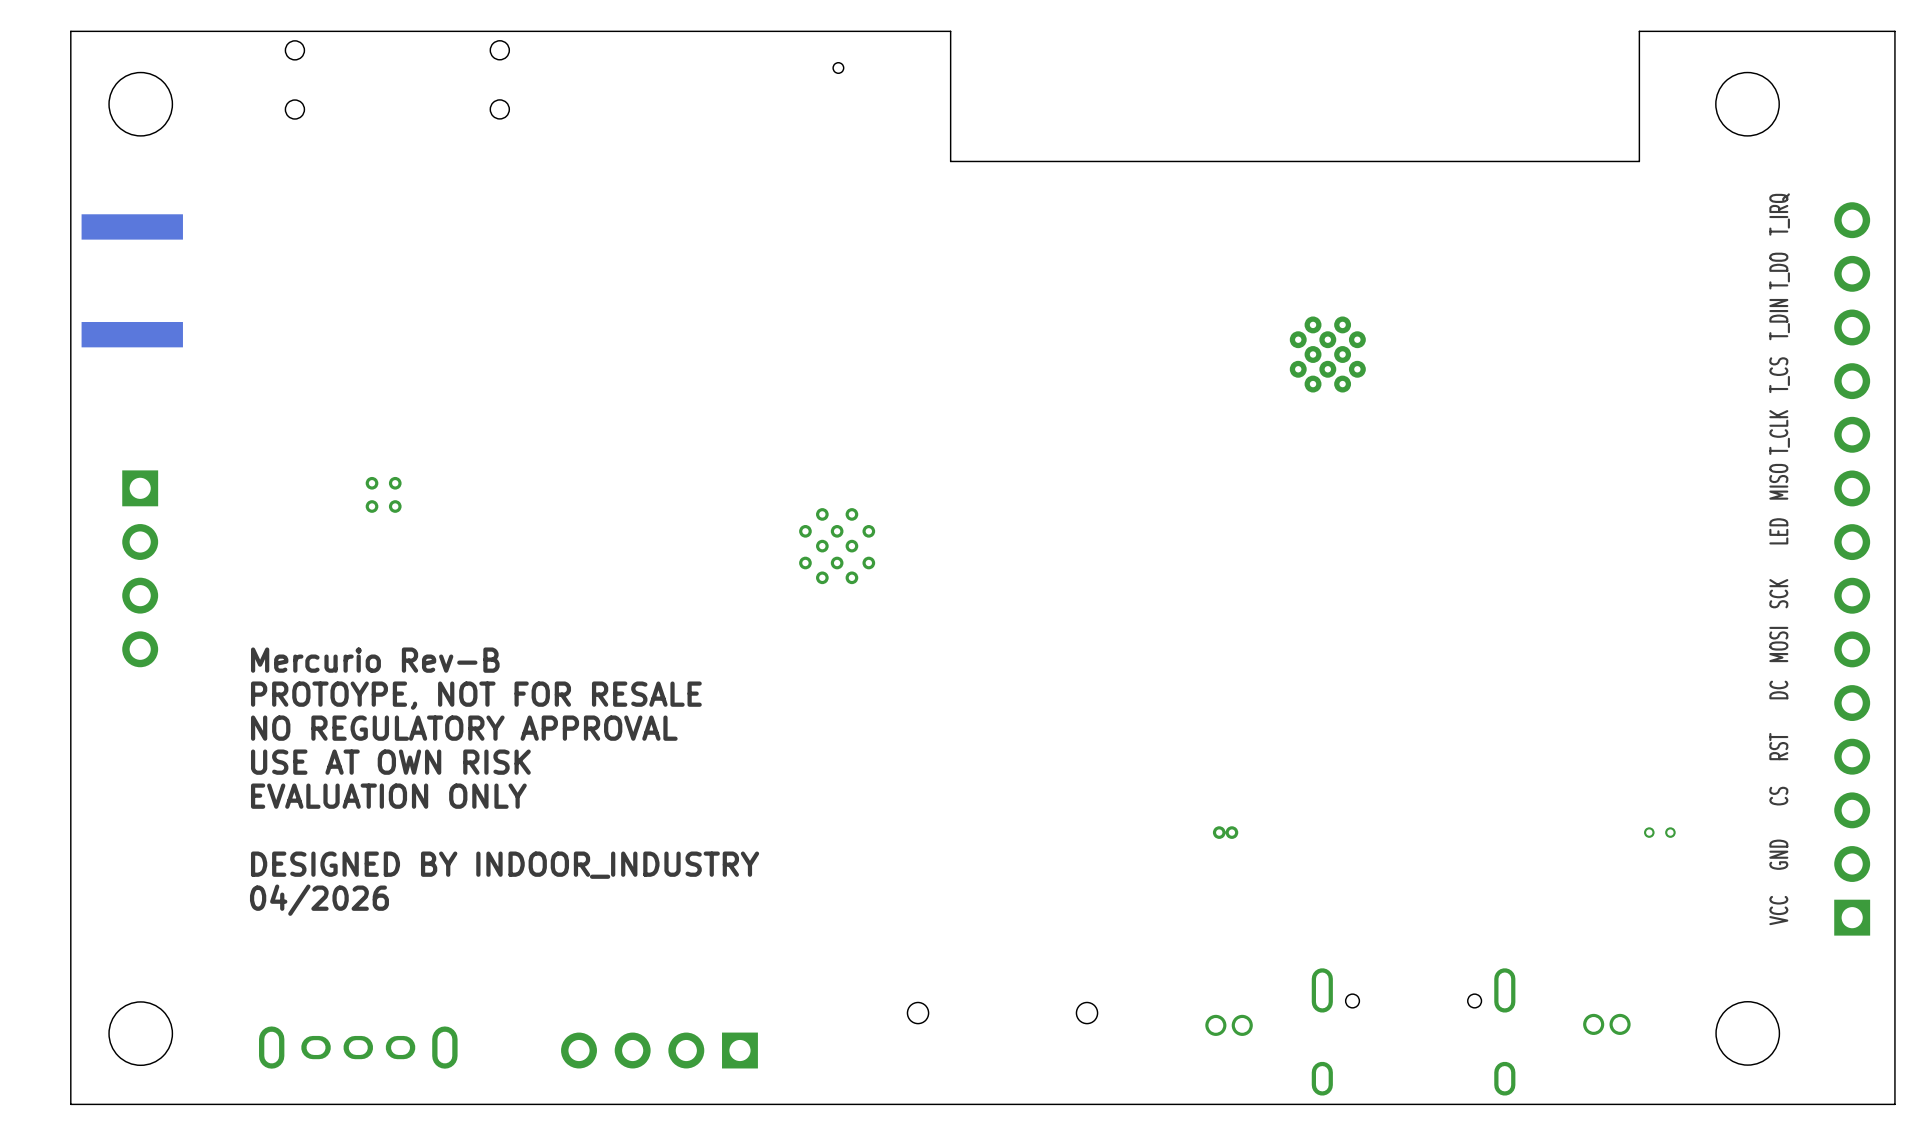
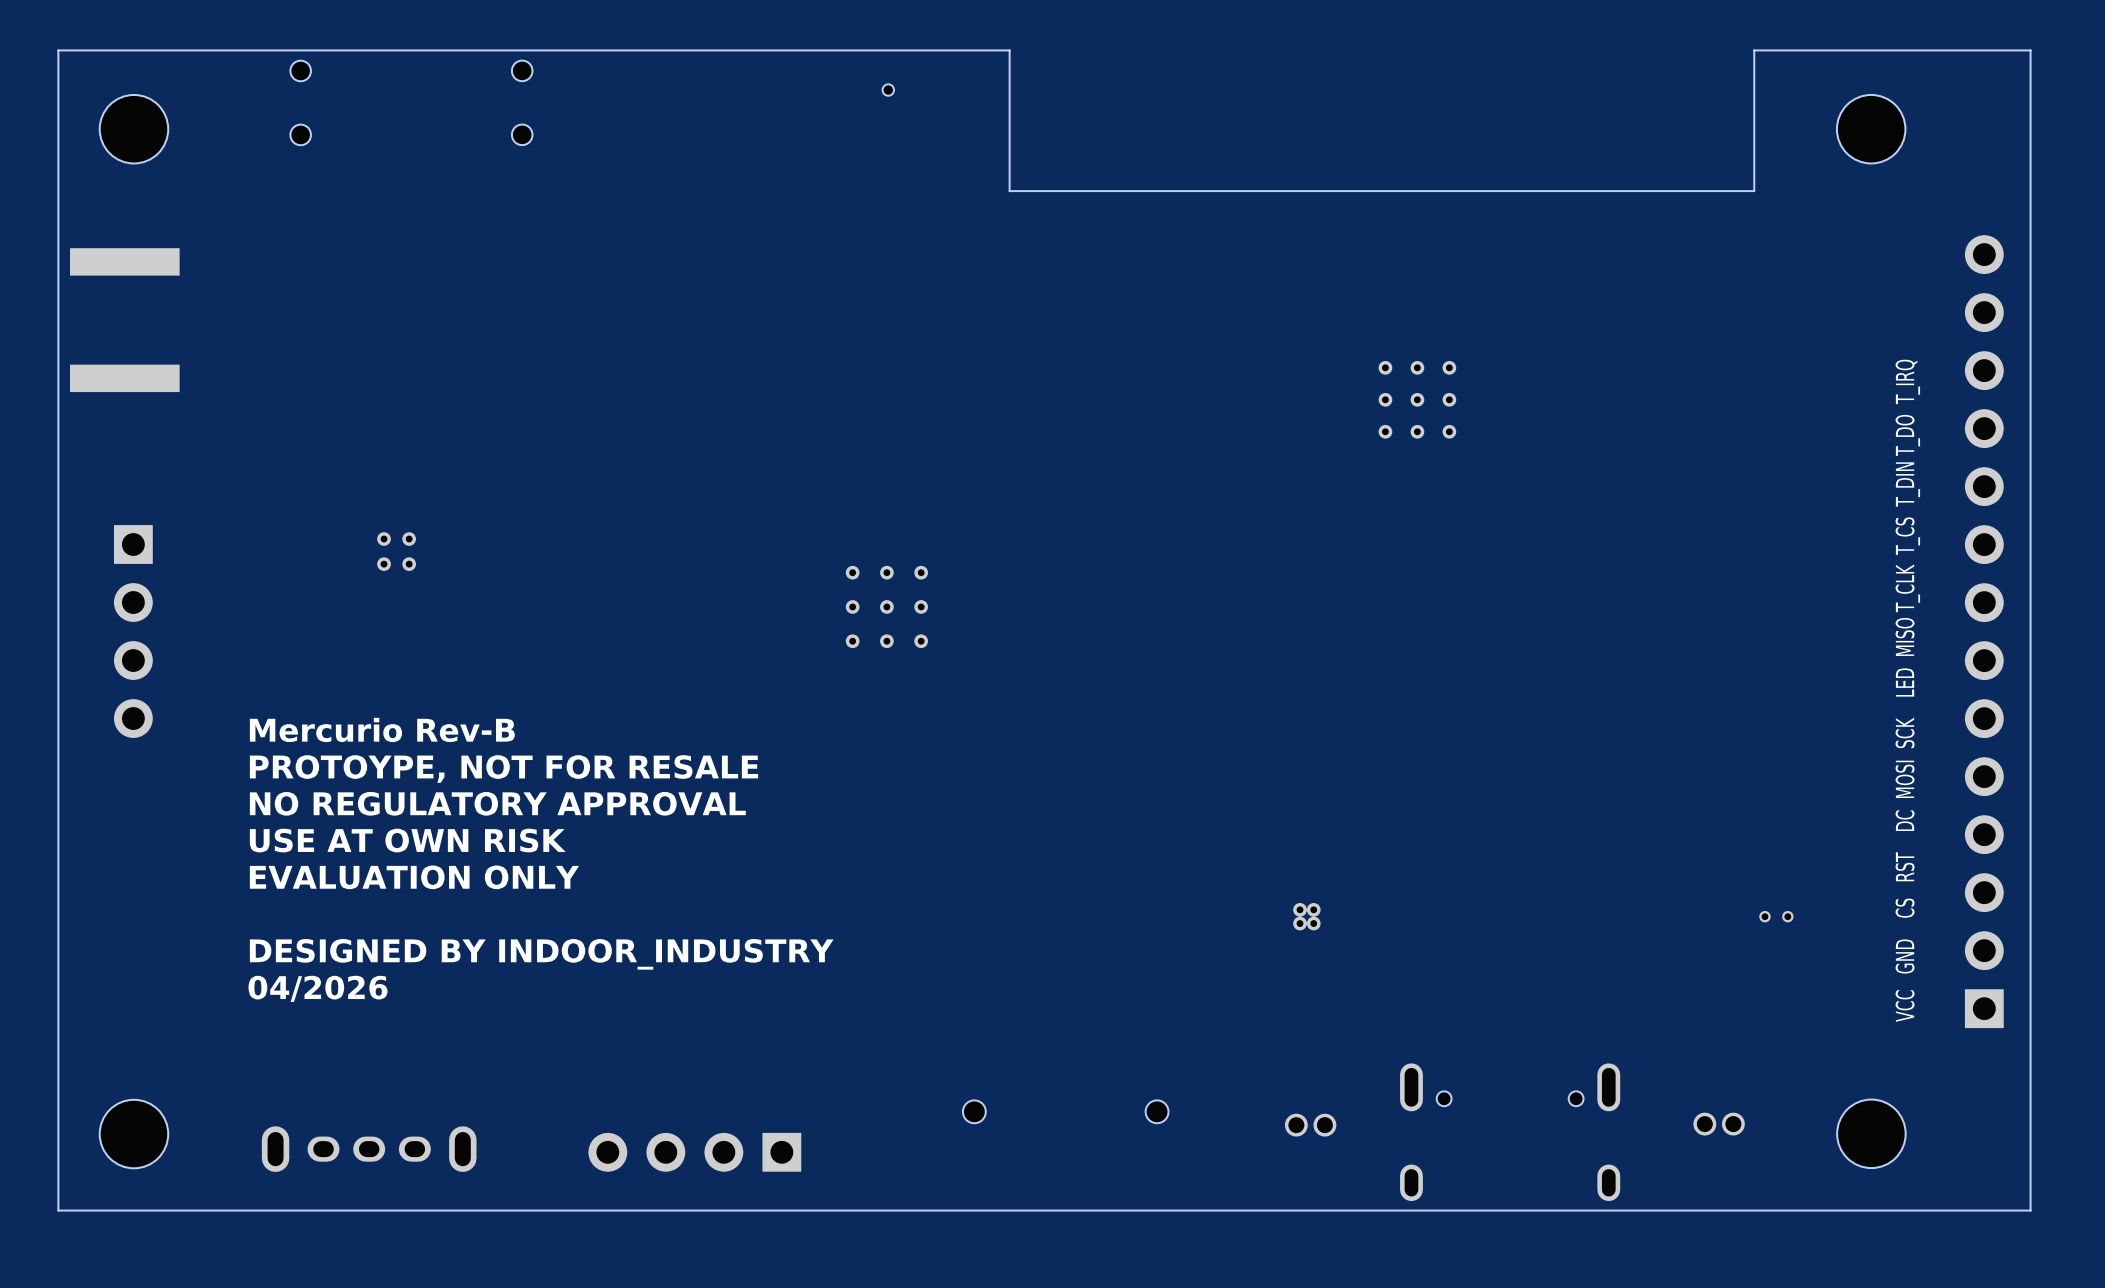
part footprint: [1289, 316, 1366, 393] -> [1378, 360, 1457, 439]
part footprint: [799, 508, 876, 585] -> [845, 565, 929, 649]
part footprint: [1212, 826, 1239, 839] -> [1293, 902, 1321, 931]

